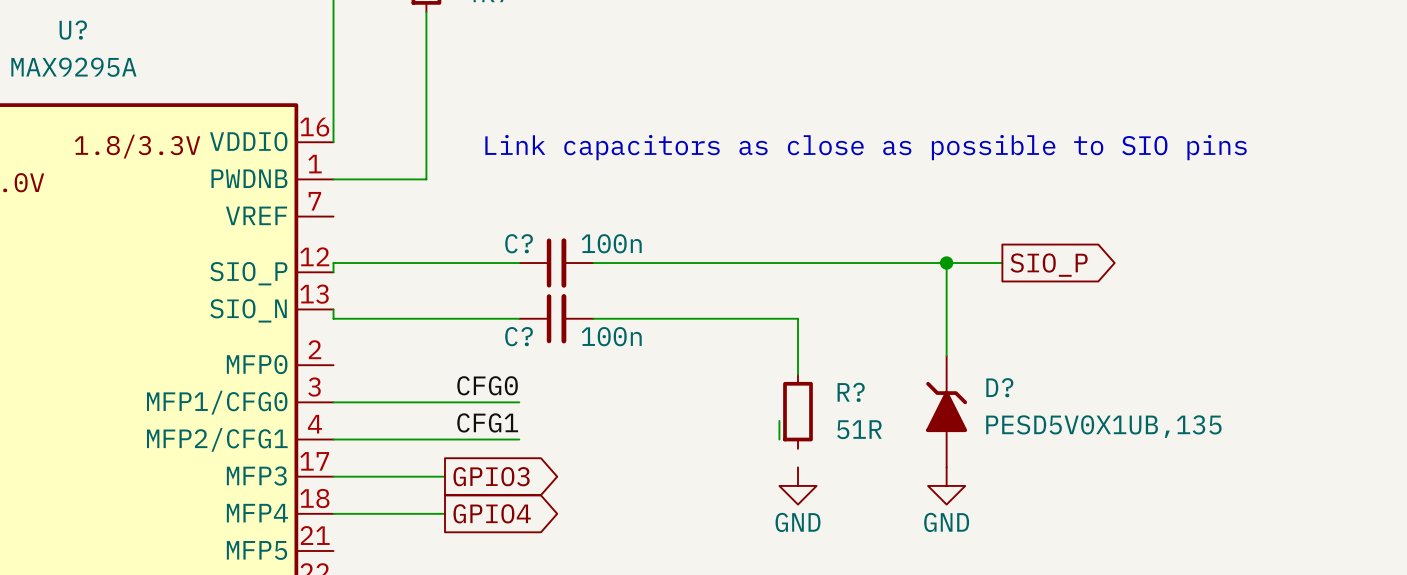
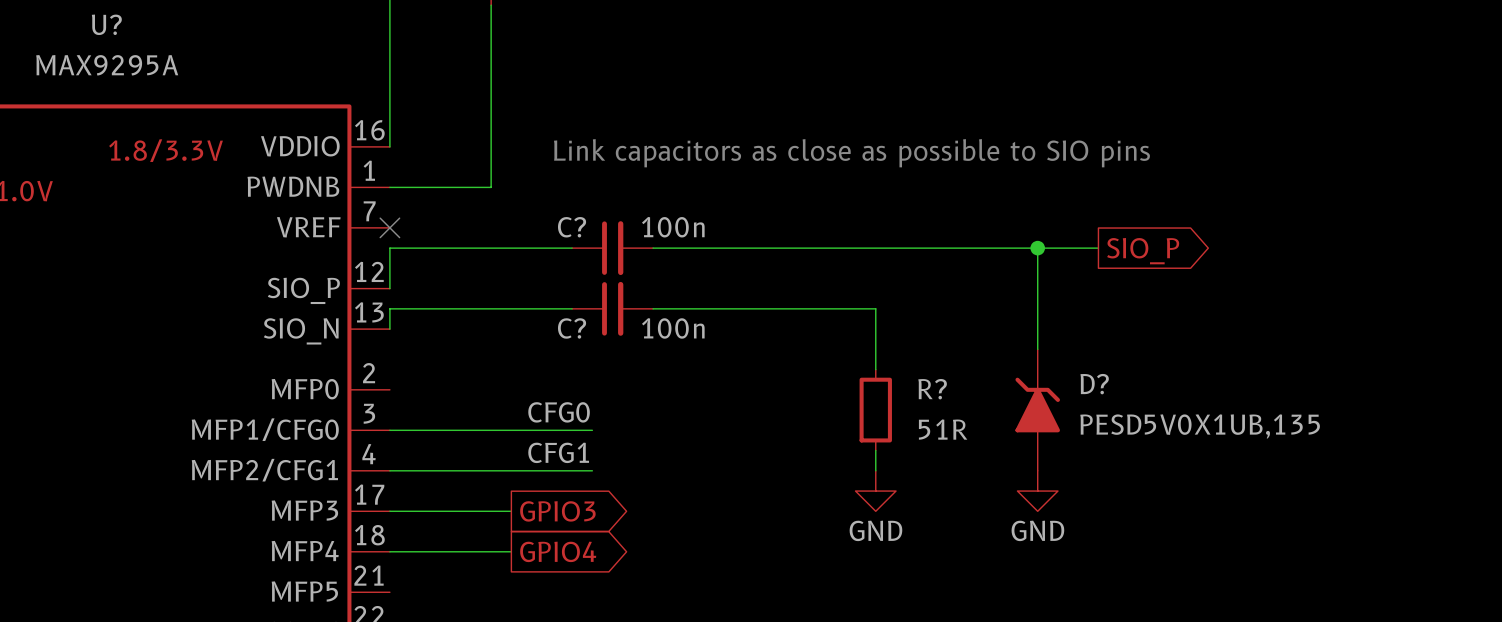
no-connect mark: none -> (389, 227)
C?: none -> (612, 248)
wire: (333, 263) (519, 263) -> (389, 278) (389, 248) (572, 248)
C?: (556, 263) -> none
wire: (593, 263) (1002, 263) -> (653, 248) (1098, 248)
wire: (946, 263) (946, 355) -> (1037, 248) (1037, 349)
junction position: (946, 263) -> (1037, 248)
global label position: SIO_P (1049, 265) -> SIO_P (1143, 251)
C?: none -> (612, 308)
wire: (333, 309) (333, 318) (519, 318) -> (389, 329) (389, 308) (572, 308)
C?: (556, 318) -> none
wire: (593, 318) (798, 318) (798, 374) -> (653, 308) (875, 308) (875, 369)
R? position: (798, 411) -> (875, 410)
D? position: (946, 411) -> (1037, 410)
power symbol position: GND (798, 485) -> GND (875, 491)
power symbol position: GND (946, 485) -> GND (1037, 491)

